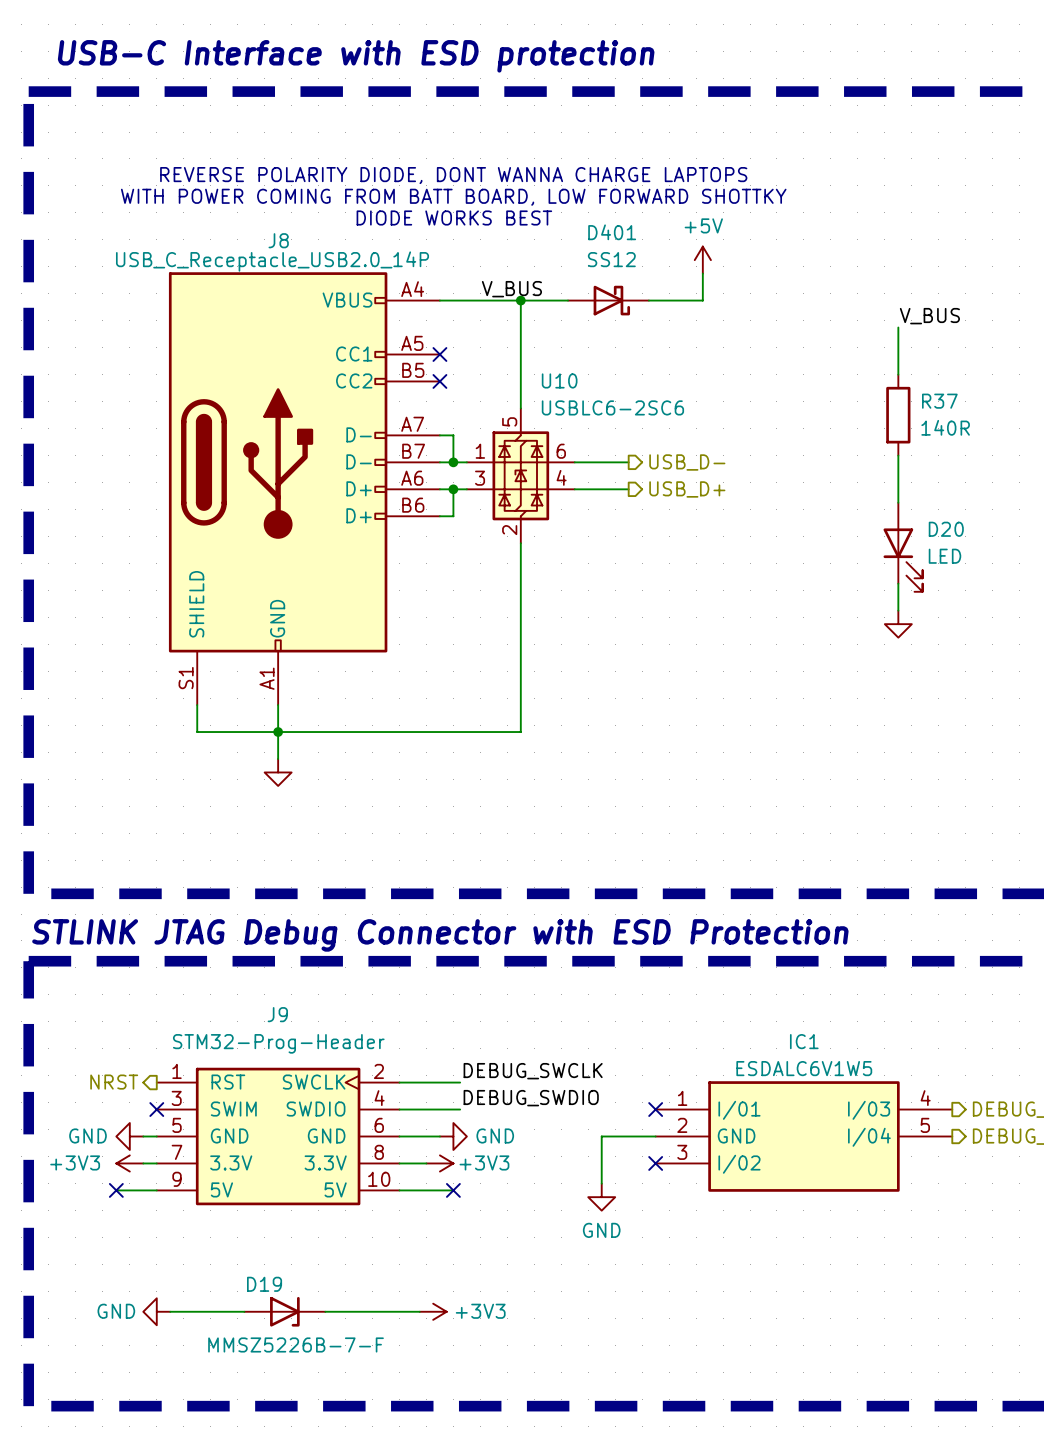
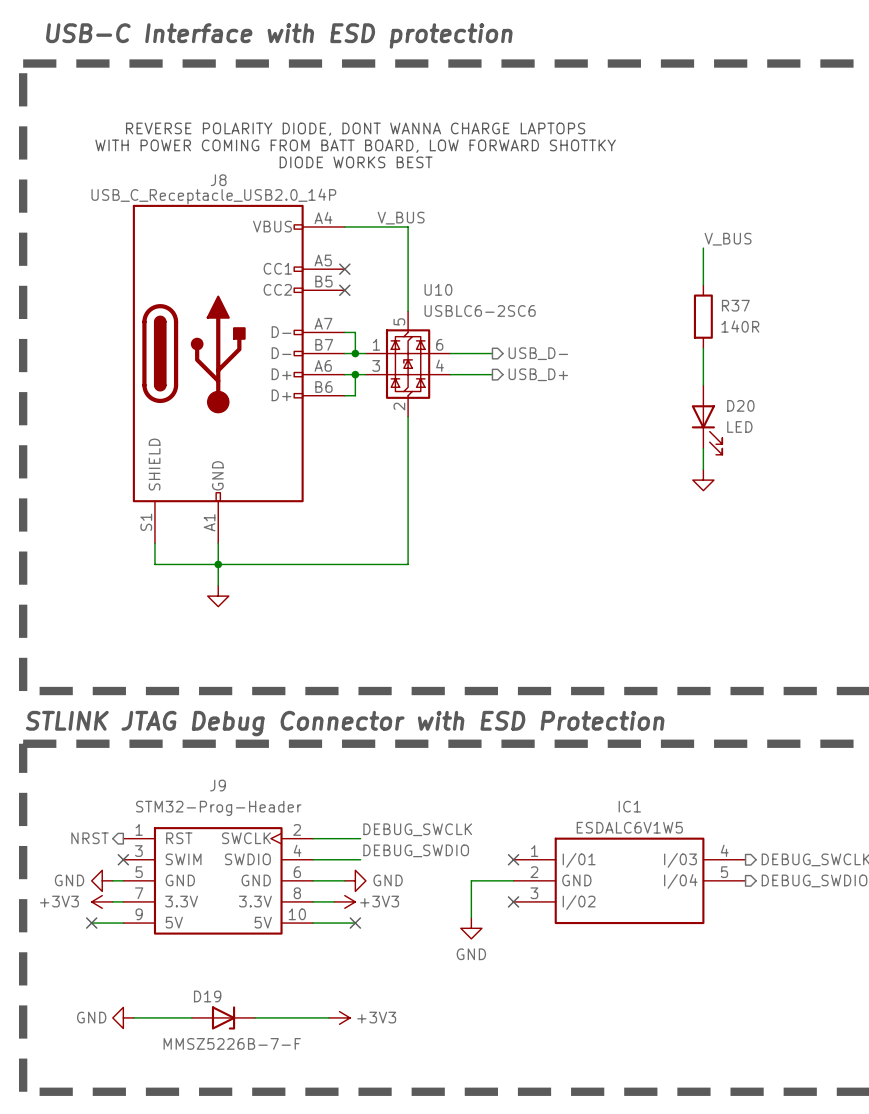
power symbol: +5V (702, 260) -> none
wire: (702, 273) (702, 300) (648, 300) -> none
wire: (520, 300) (568, 300) -> none
junction: (520, 300) -> none
D401: SS12 (608, 300) -> none

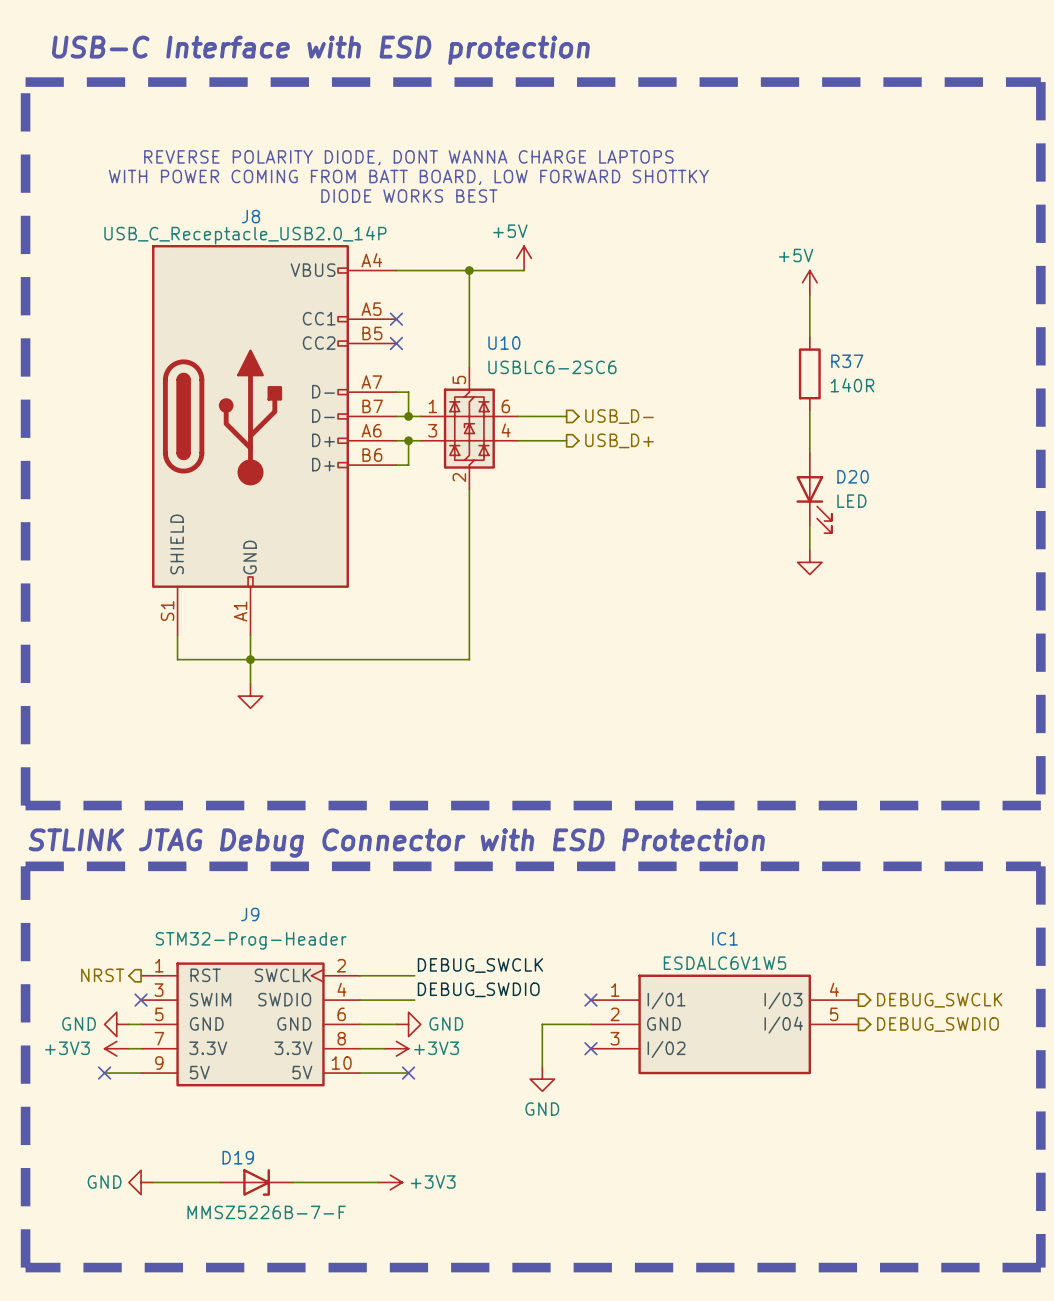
power symbol: none -> +5V (524, 258)
label: V_BUS (401, 218) -> none
wire: none -> (469, 270) (524, 270)
junction: none -> (469, 270)
power symbol: none -> +5V (809, 282)
label: V_BUS (728, 239) -> none

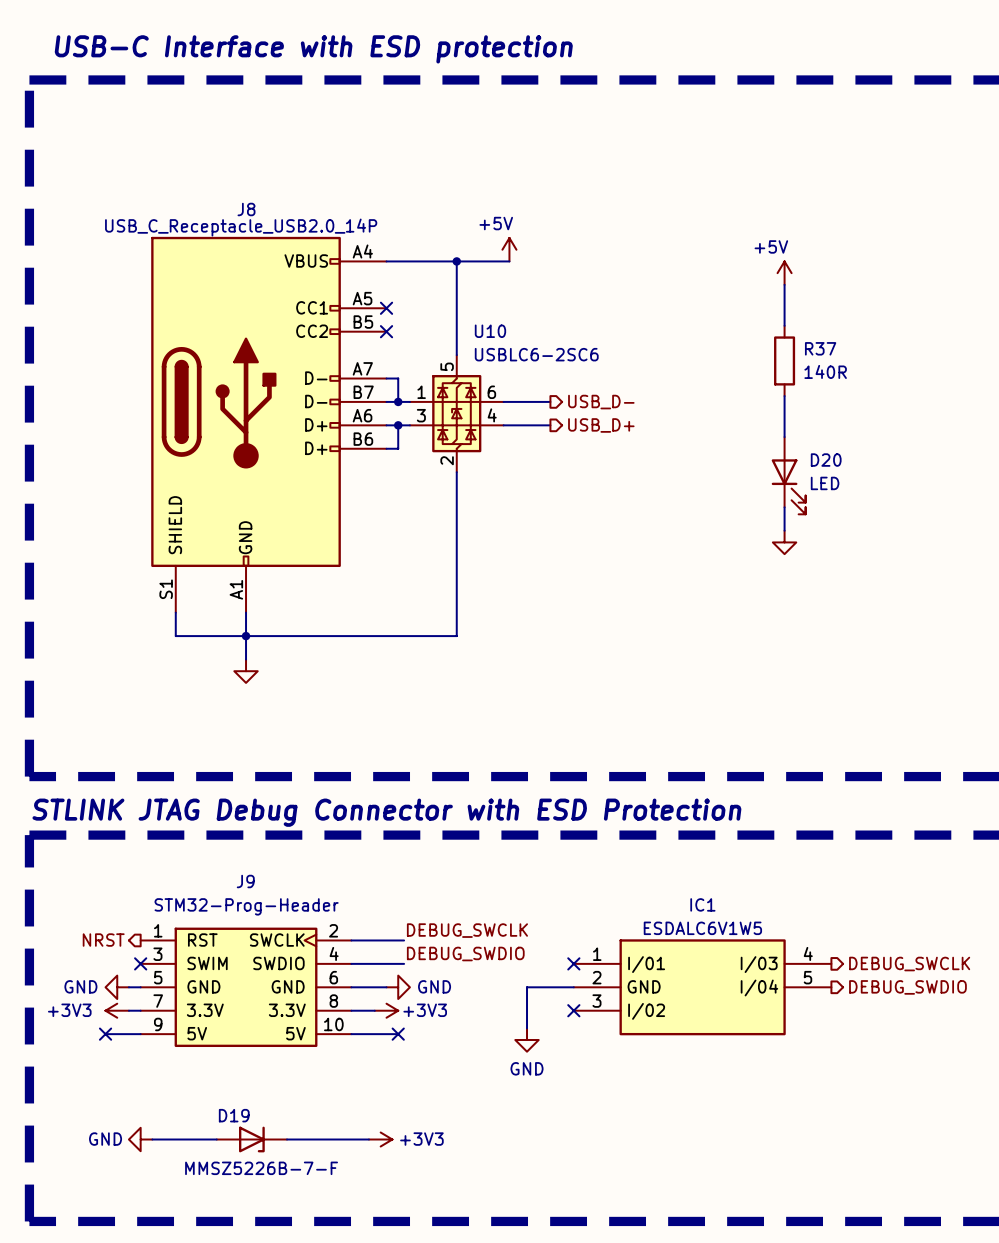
text: REVERSE POLARITY DIODE, DONT WANNA CHARGE LAPTOPS (408, 157) -> none
text: WITH POWER COMING FROM BATT BOARD, LOW FORWARD SHOTTKY (408, 177) -> none
text: DIODE WORKS BEST (409, 196) -> none

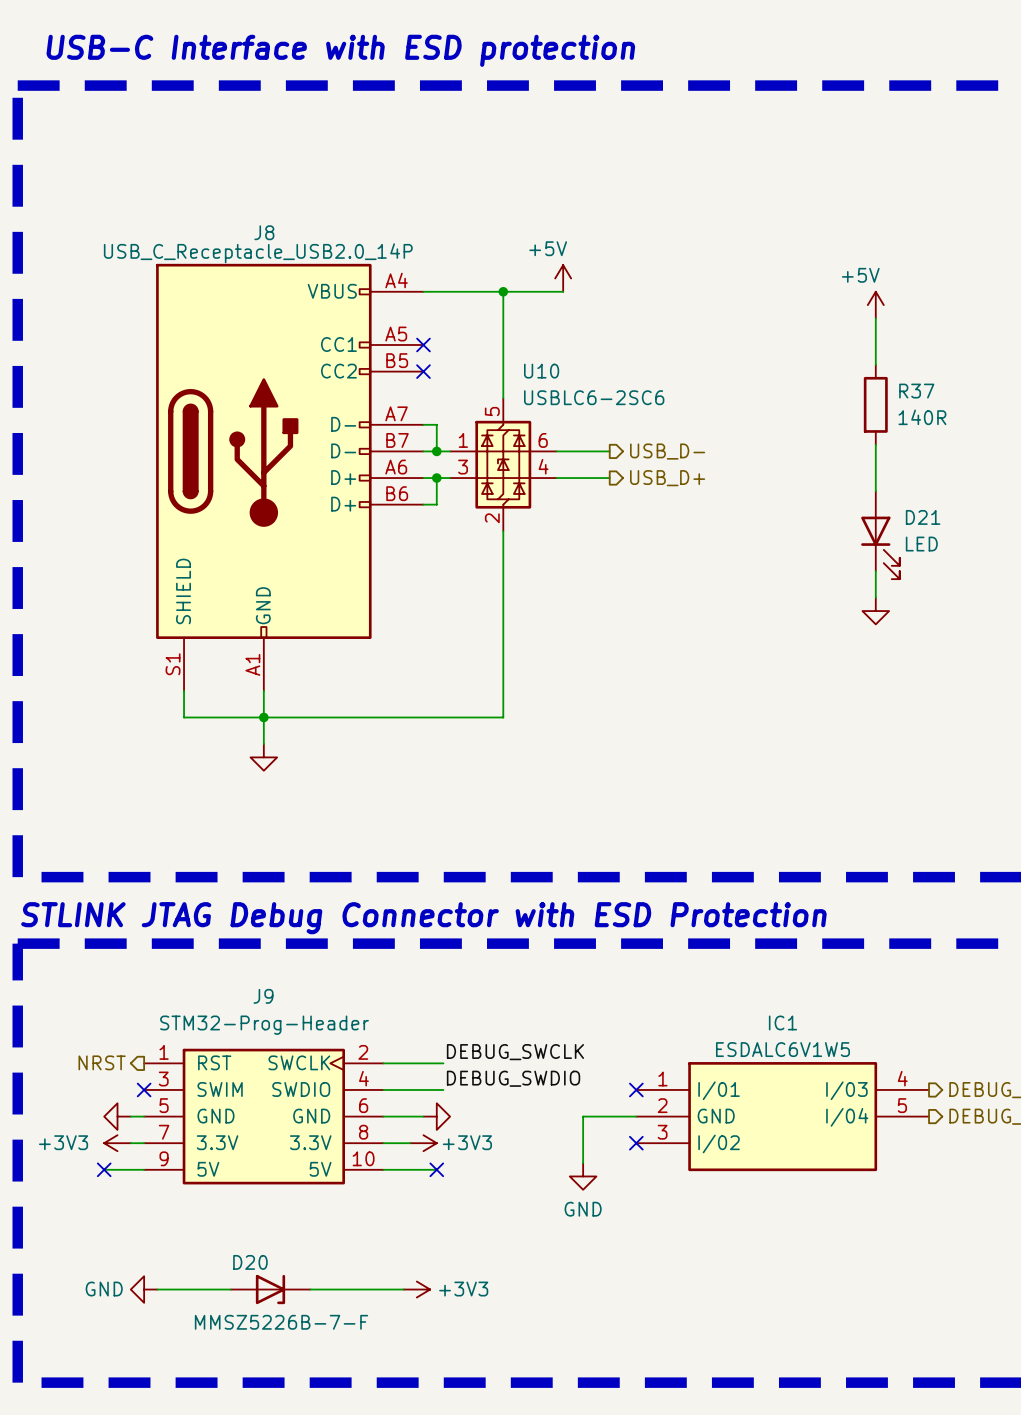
D20 name: D20 (826, 460) -> D21 (923, 517)
power symbol text: GND (80, 986) -> none
power symbol text: GND (434, 986) -> none
D19 name: D19 (234, 1115) -> D20 (250, 1262)

